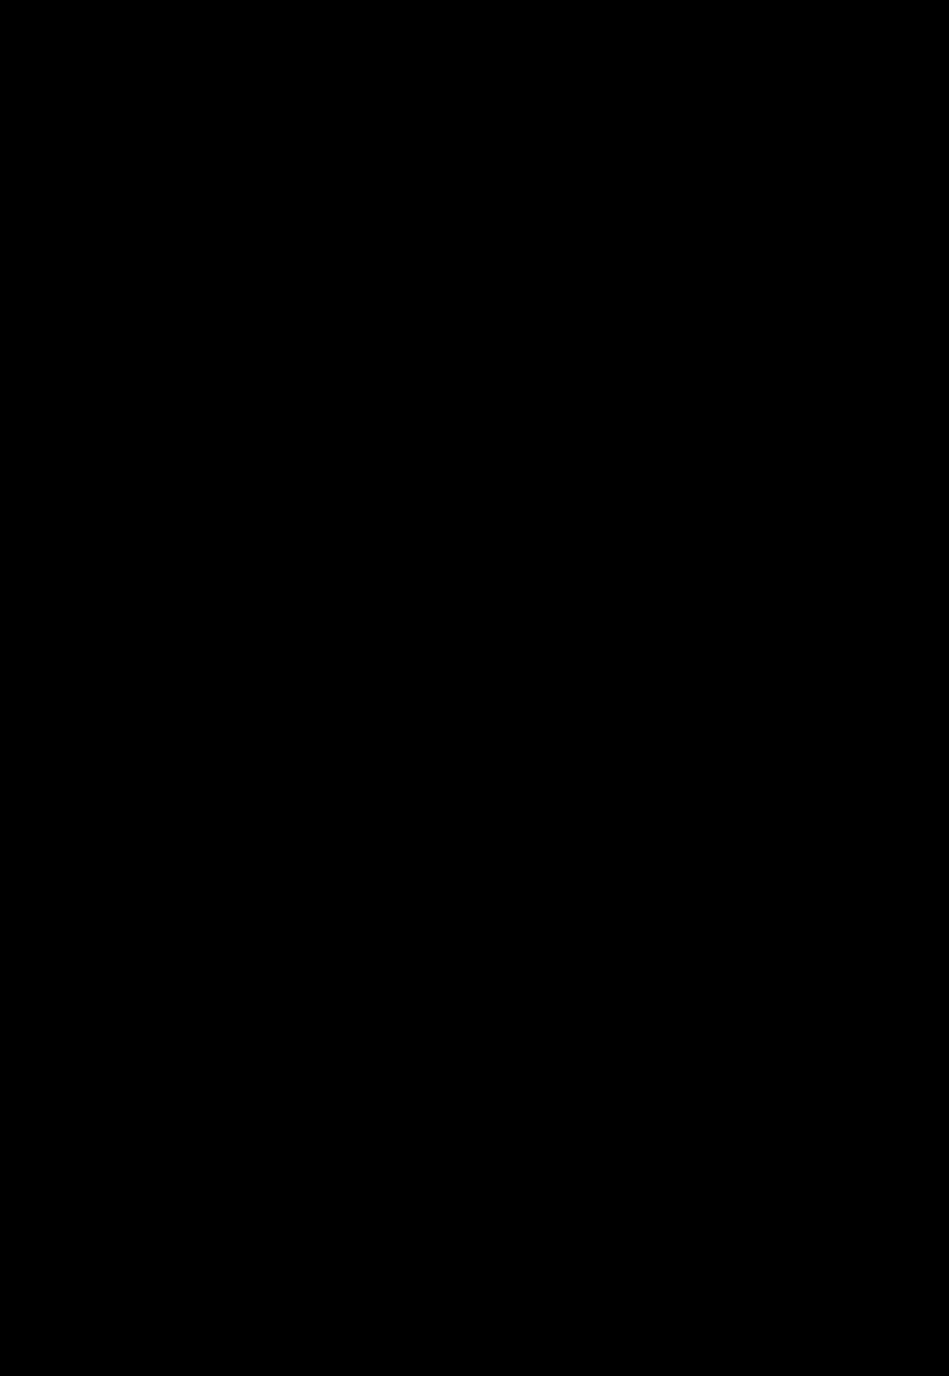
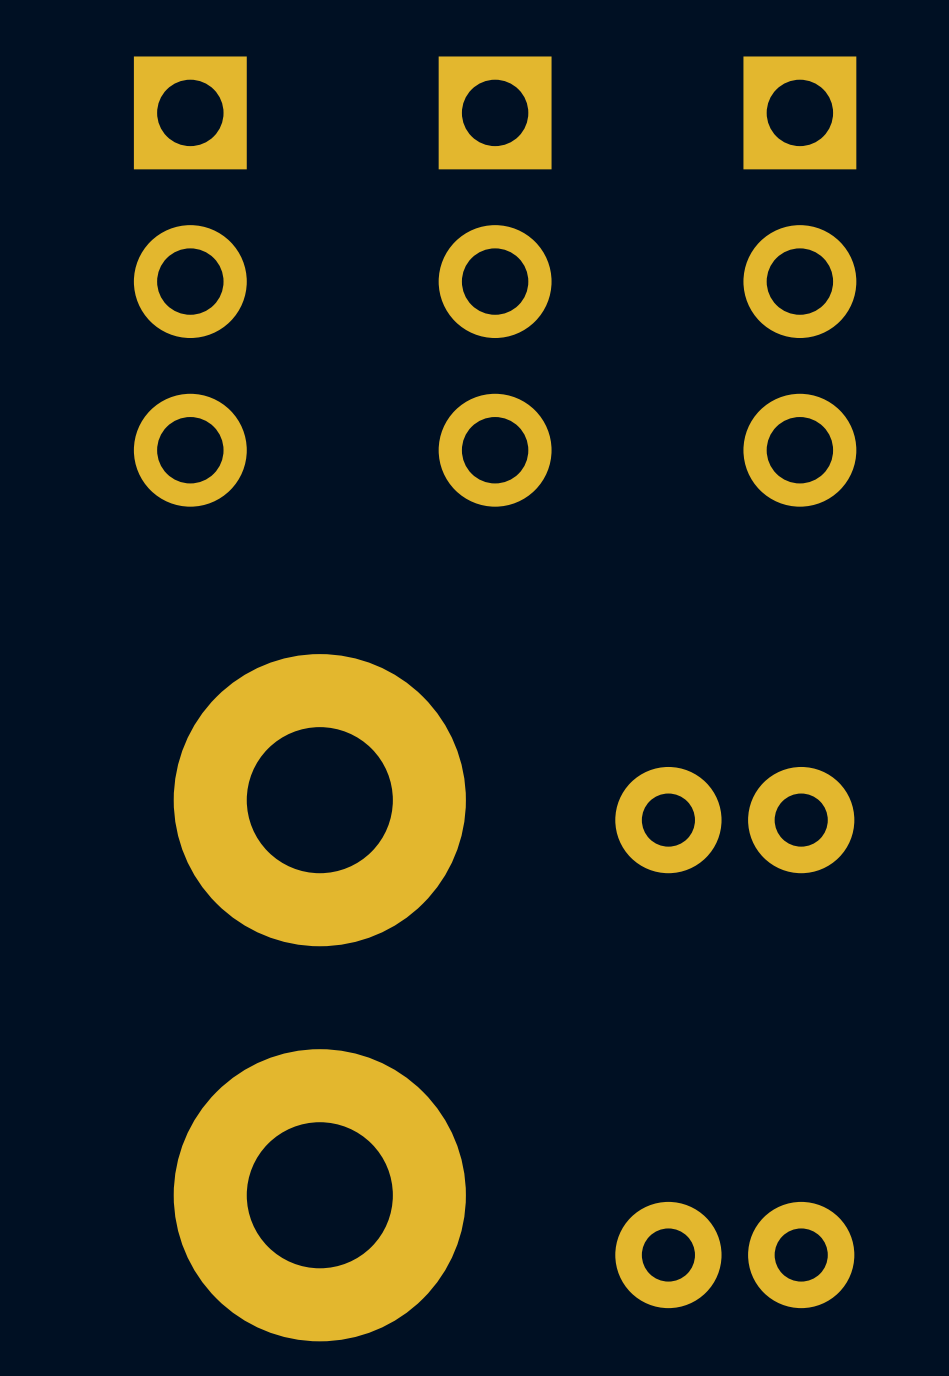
part: none -> (190, 281)
part: none -> (495, 281)
part: none -> (799, 281)
part: none -> (319, 800)
part: none -> (734, 820)
part: none -> (319, 1195)
part: none -> (734, 1255)

